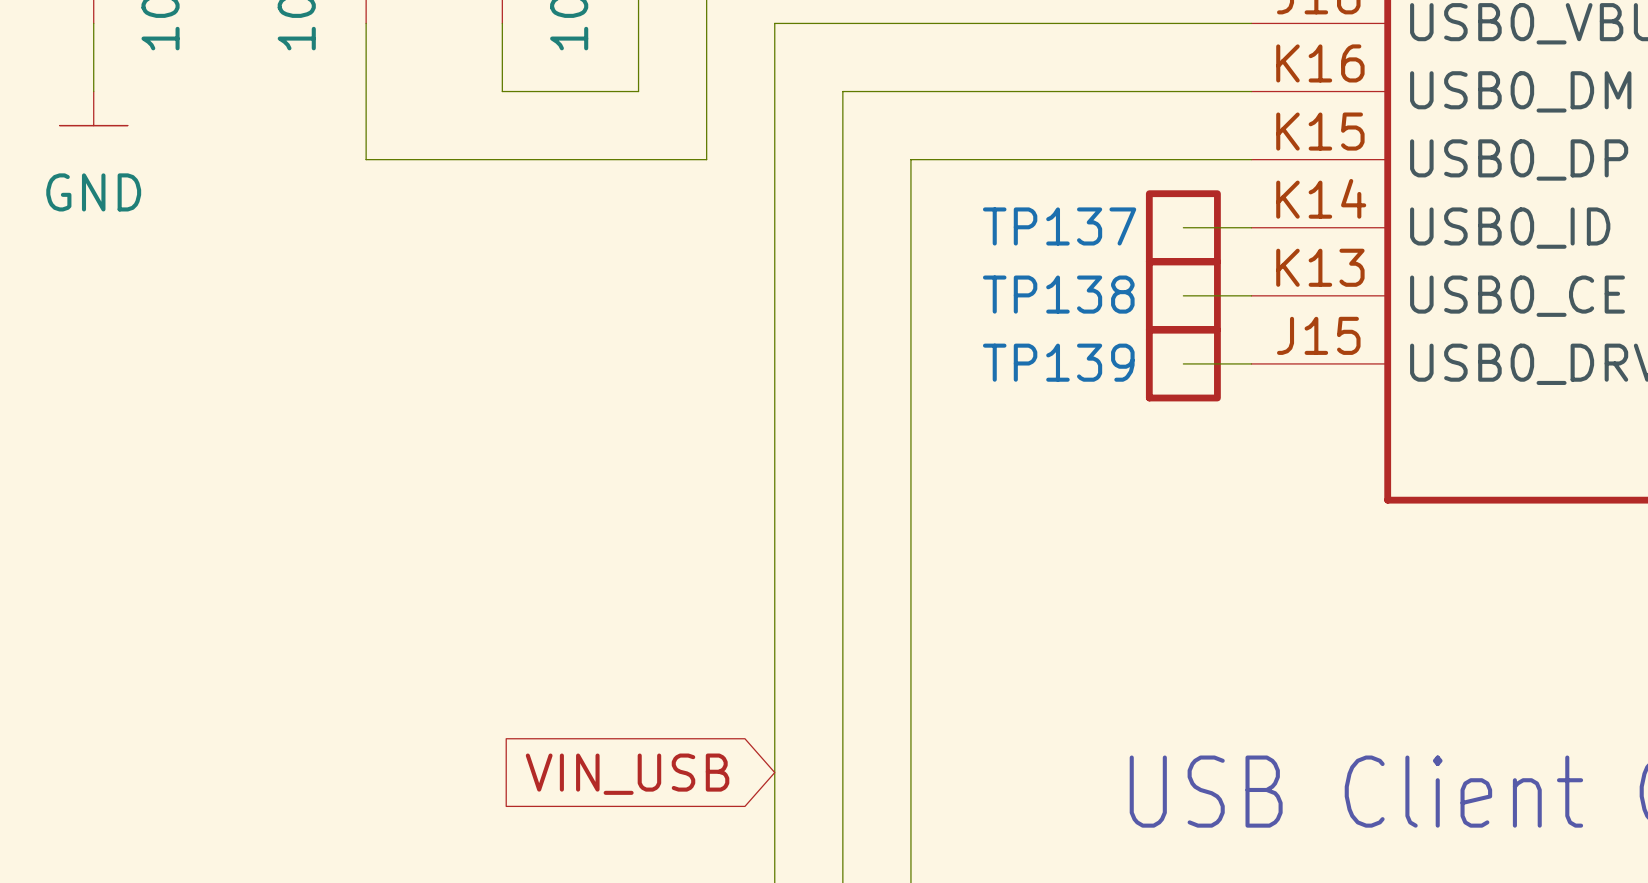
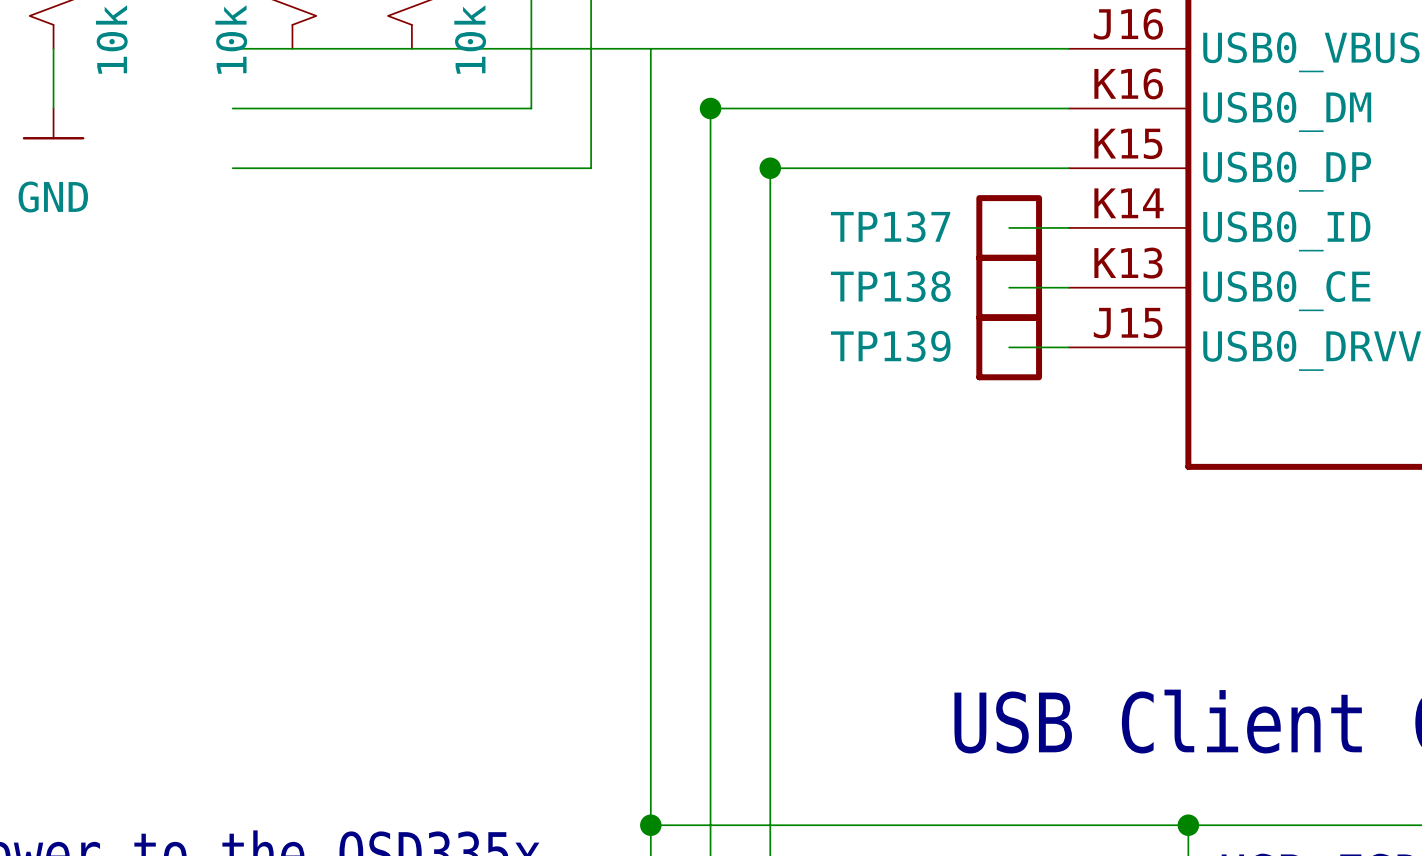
wire: none -> (232, 48) (650, 48)
wire: (366, 23) (366, 159) -> (232, 168) (292, 168)
wire: (502, 23) (502, 91) -> (232, 108) (411, 108)
junction: none -> (710, 108)
junction: none -> (770, 168)
global label: VIN_USB (627, 774) -> none

